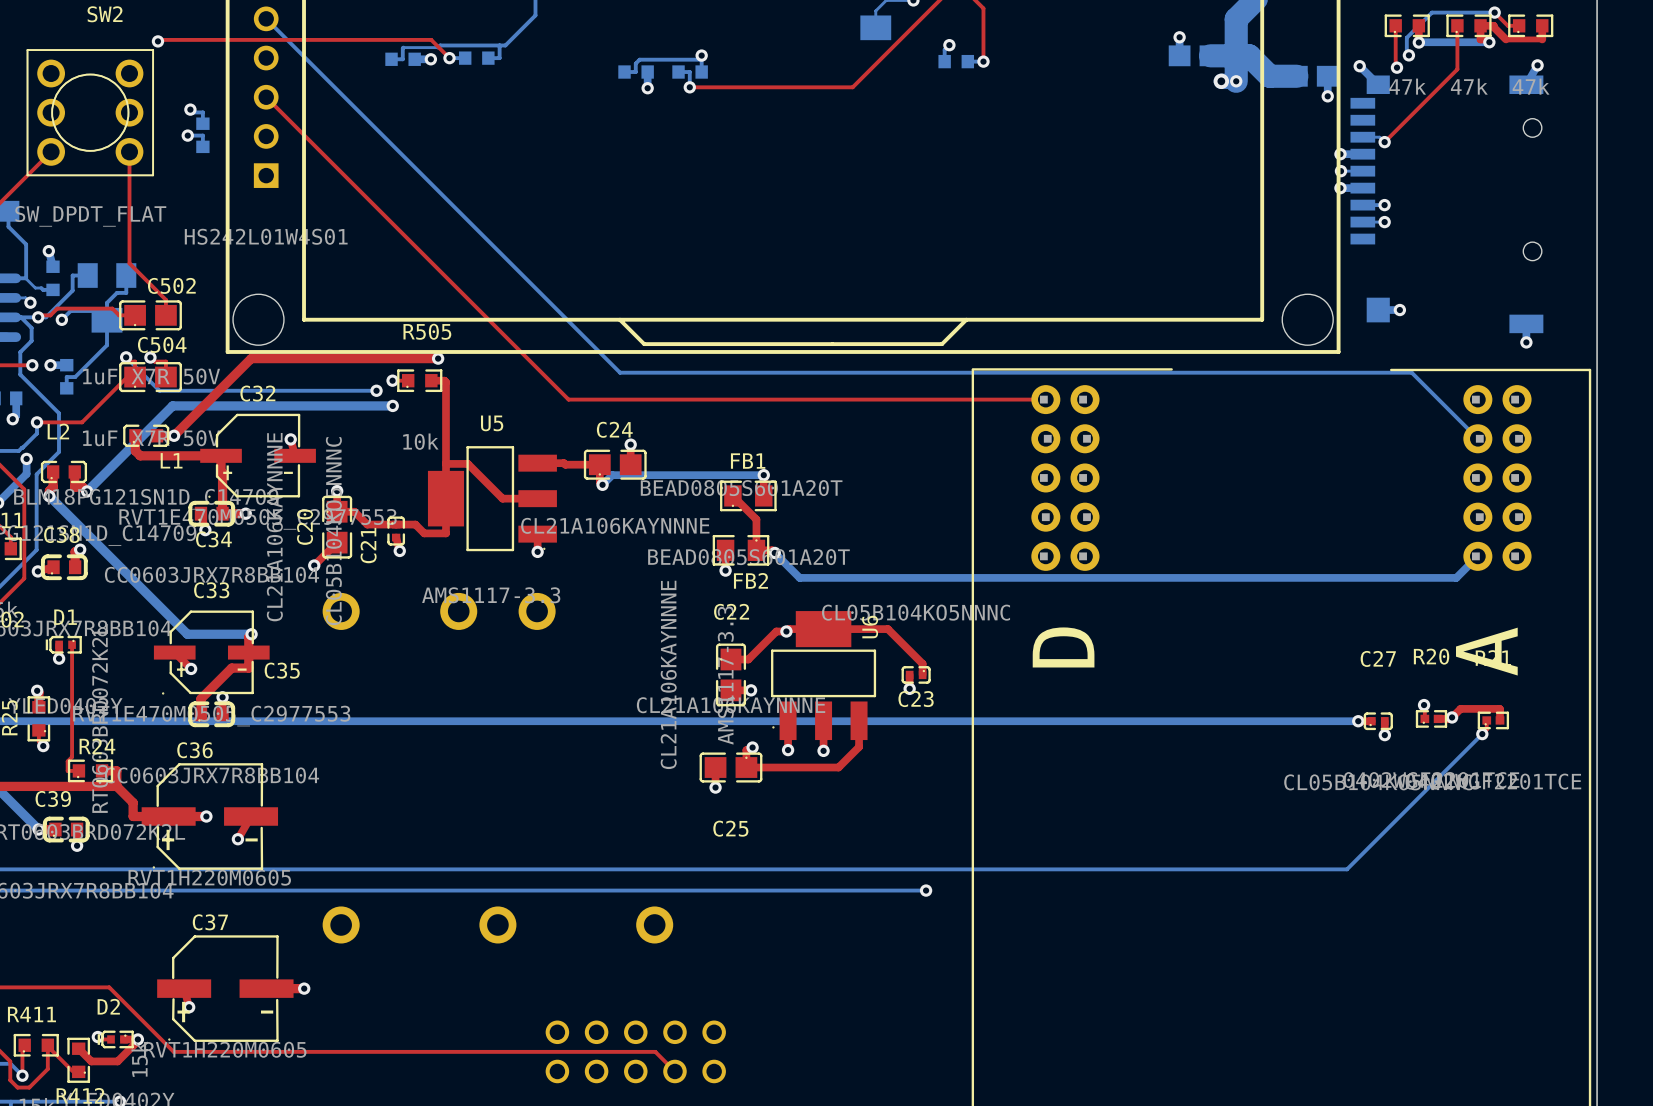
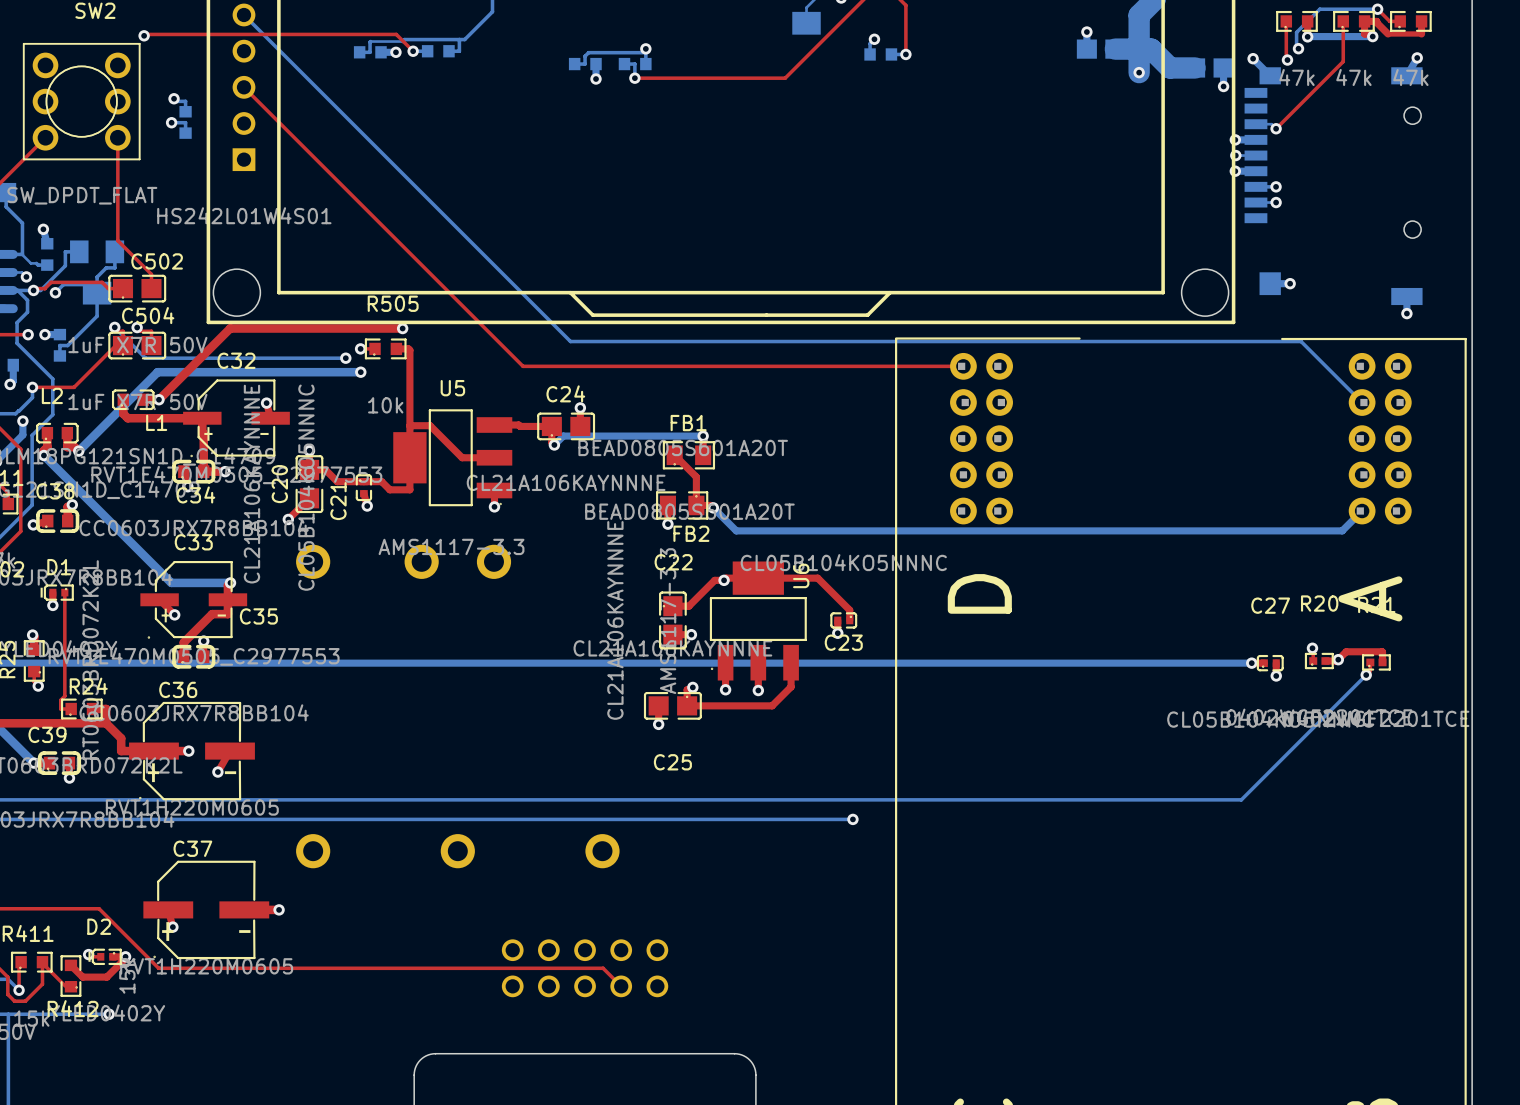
via: (1221, 81) -> none

